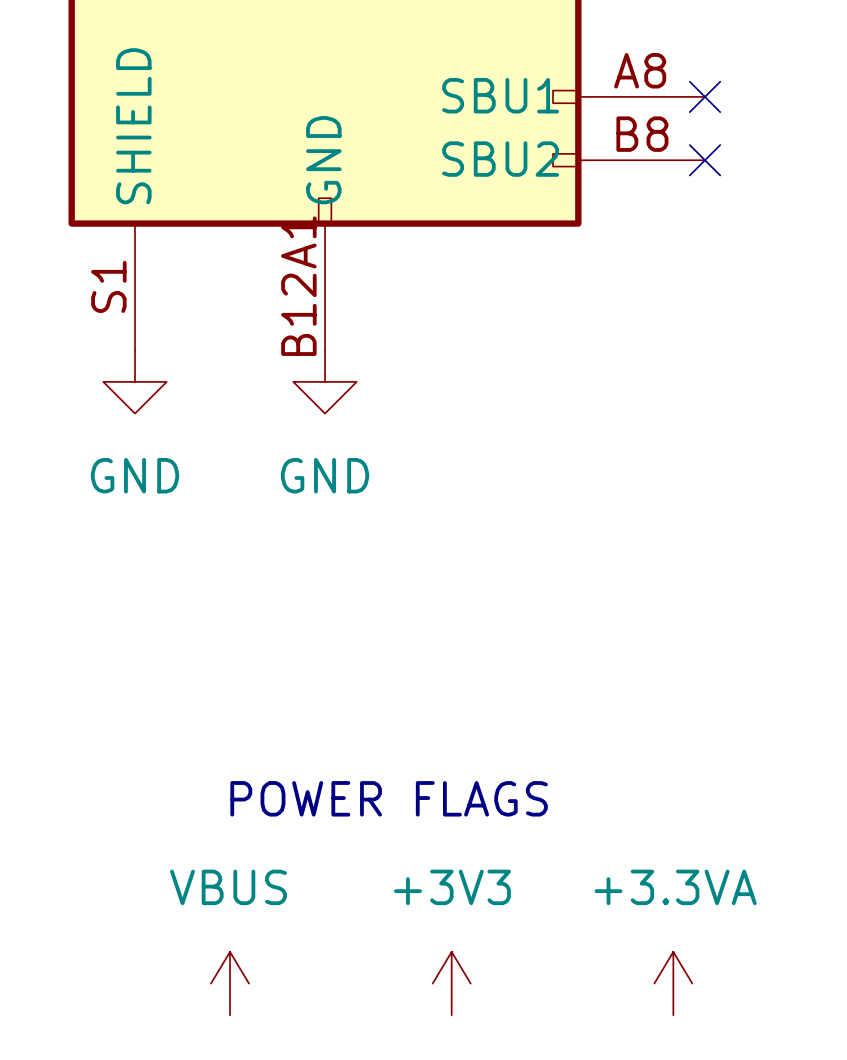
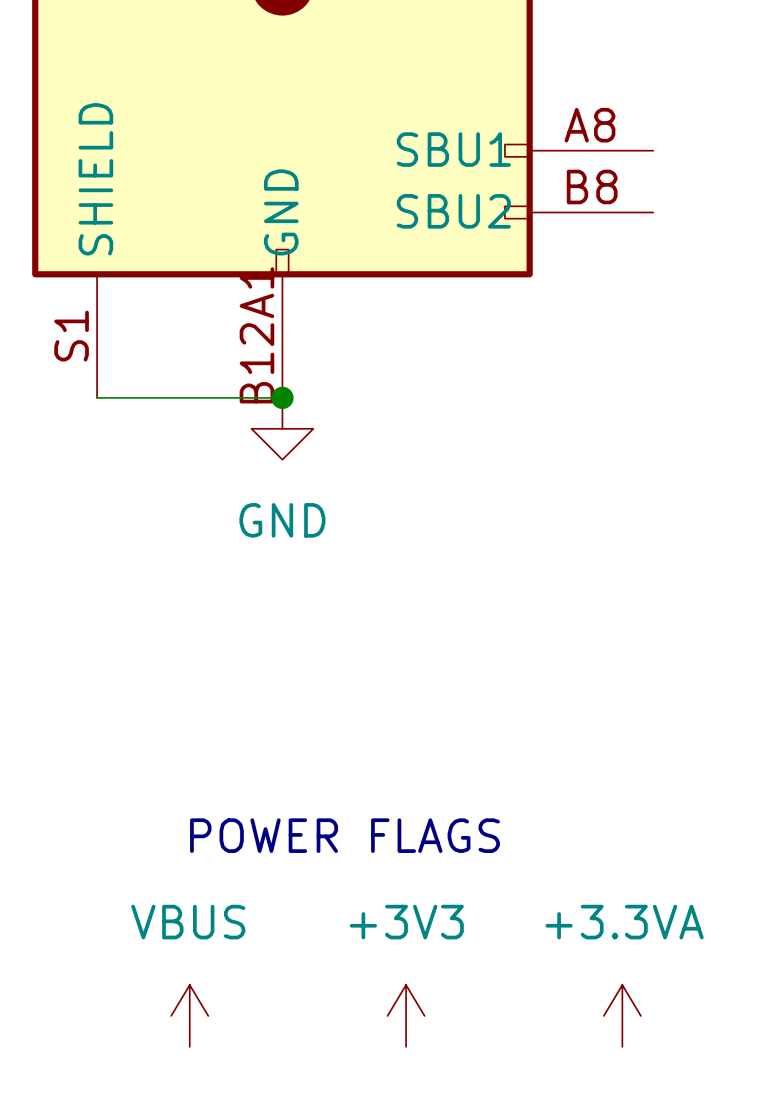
no-connect mark: (705, 96) -> none
no-connect mark: (705, 160) -> none
wire: none -> (97, 397) (282, 397)
junction: none -> (282, 397)
power symbol: GND (135, 381) -> none

